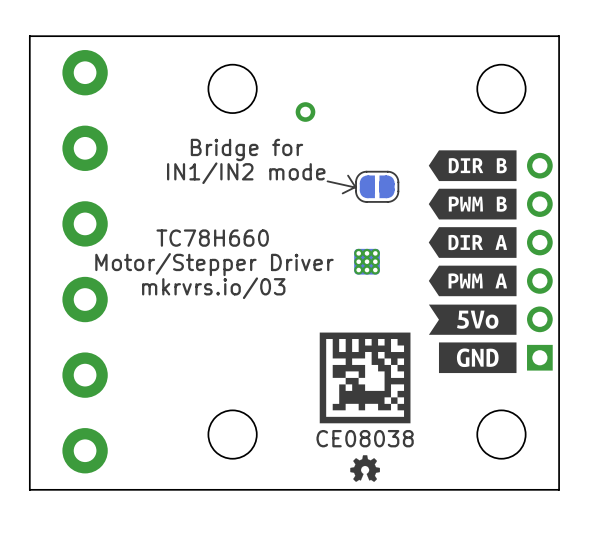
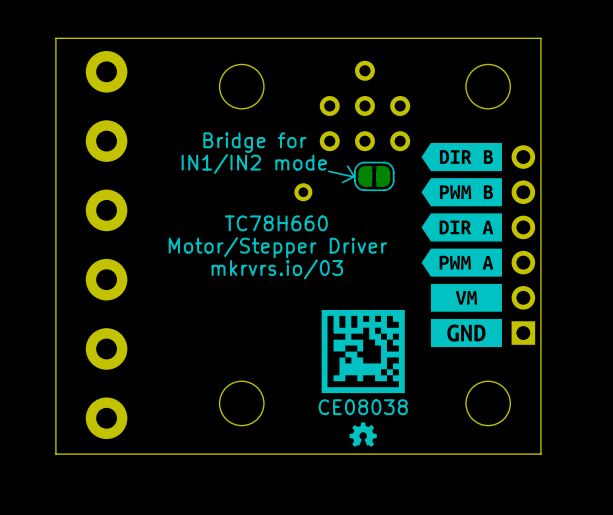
part: none -> (364, 105)
part position: (305, 112) -> (303, 192)
text position: TC78H660 (212, 238) -> TC78H660 (276, 223)
part: (367, 261) -> none
text position: Motor/Stepper Driver (214, 264) -> Motor/Stepper Driver (277, 247)
text position: mkrvrs.io/03 (213, 288) -> mkrvrs.io/03 (277, 269)
drawing shape: [428, 304, 517, 335] -> [430, 283, 502, 312]

